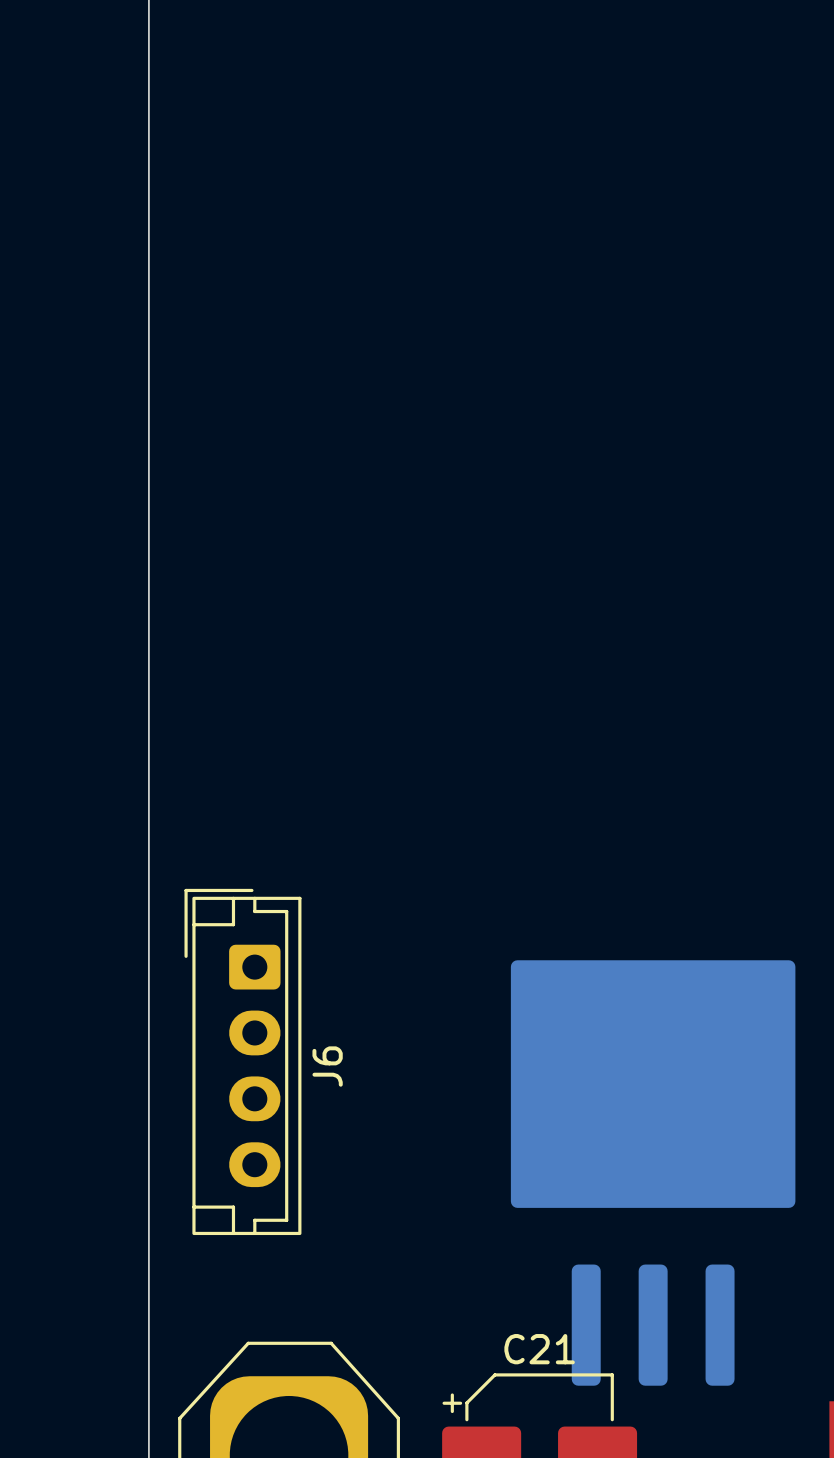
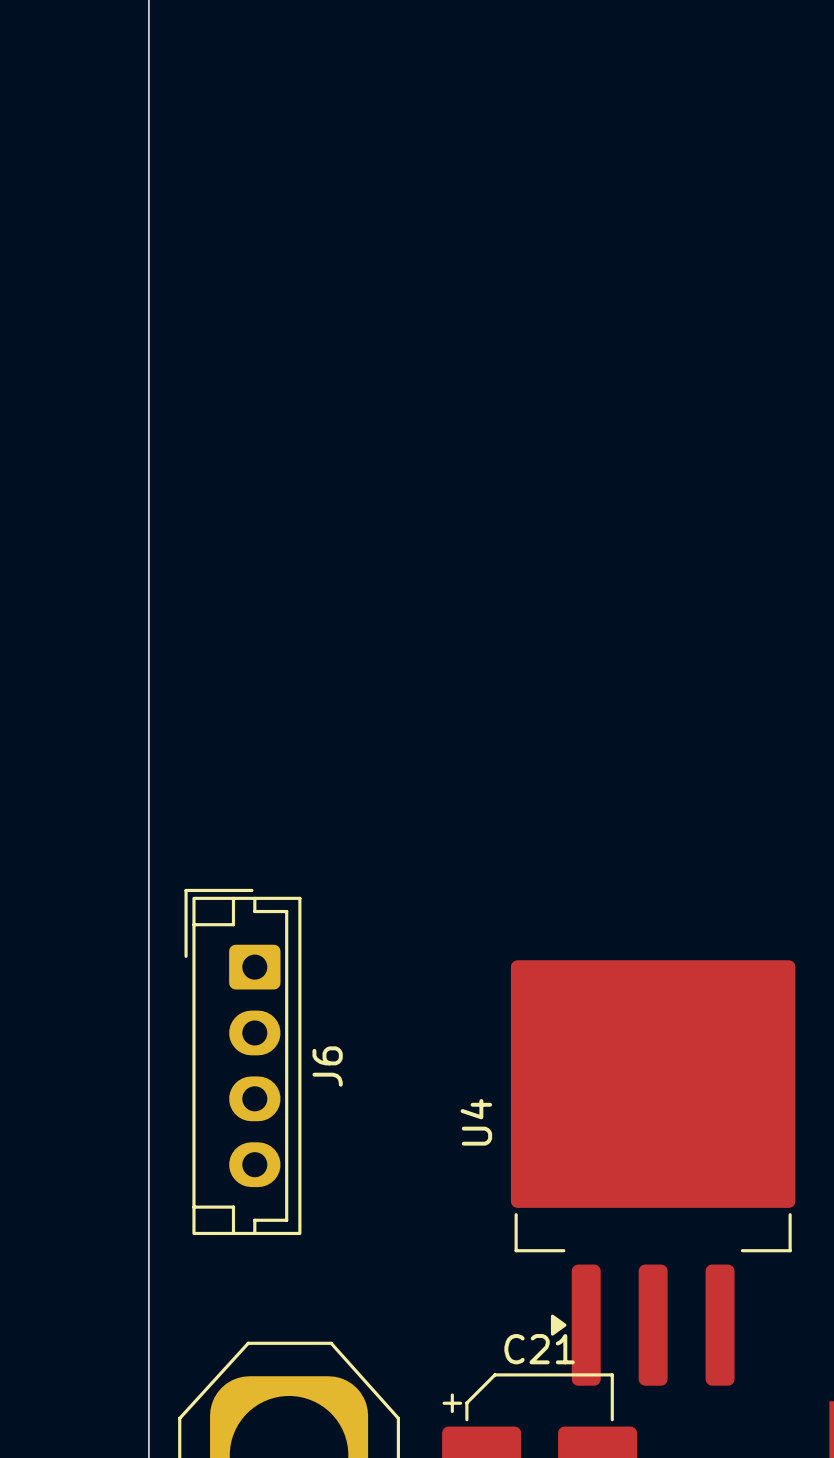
U4 side: bottom (653, 1172) -> top (653, 1172)

